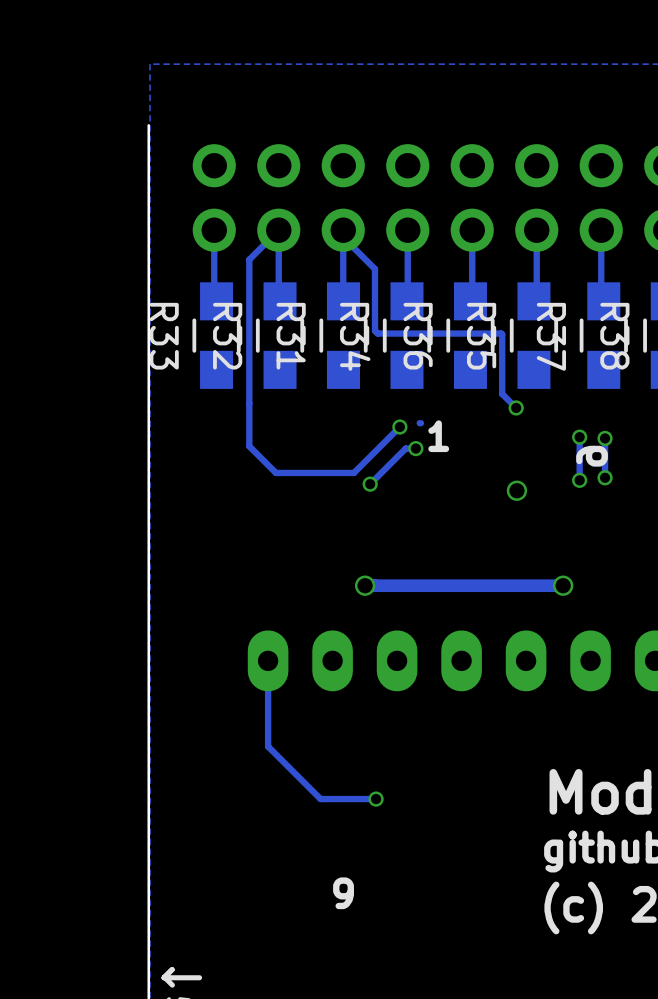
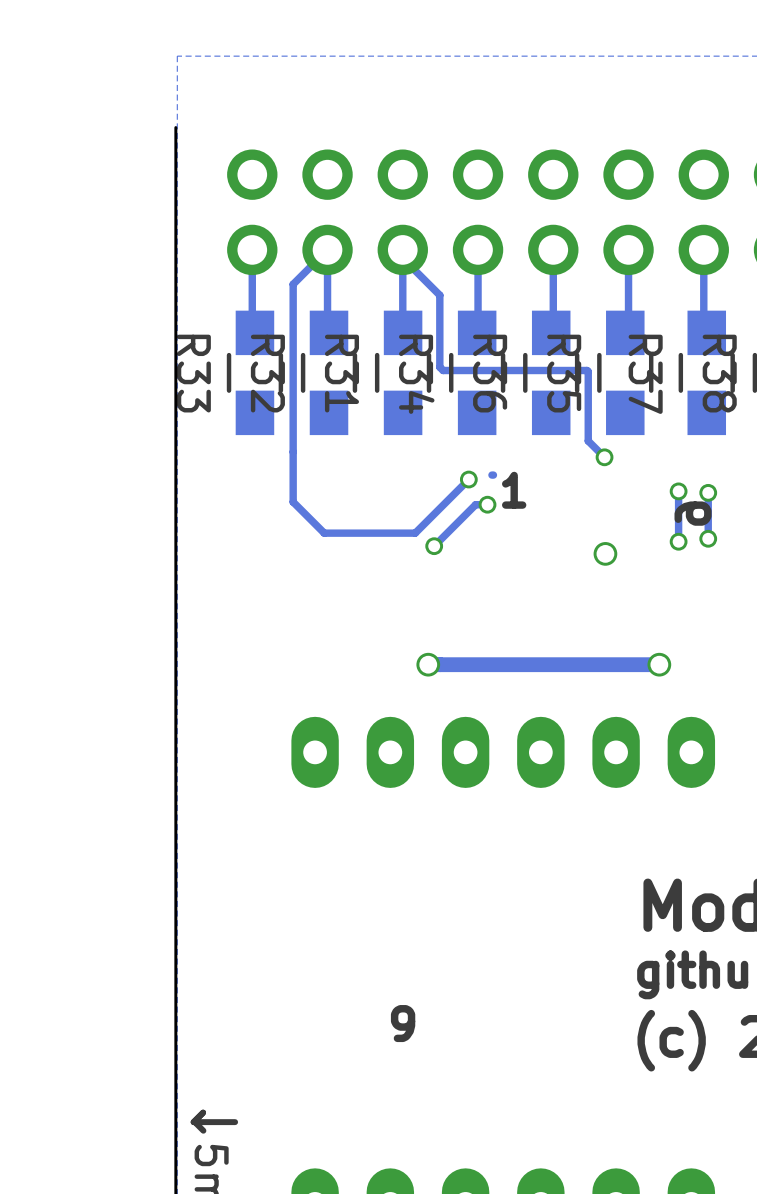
track: (268, 660) (268, 746) (320, 799) (376, 799) -> none
via: (376, 799) -> none

